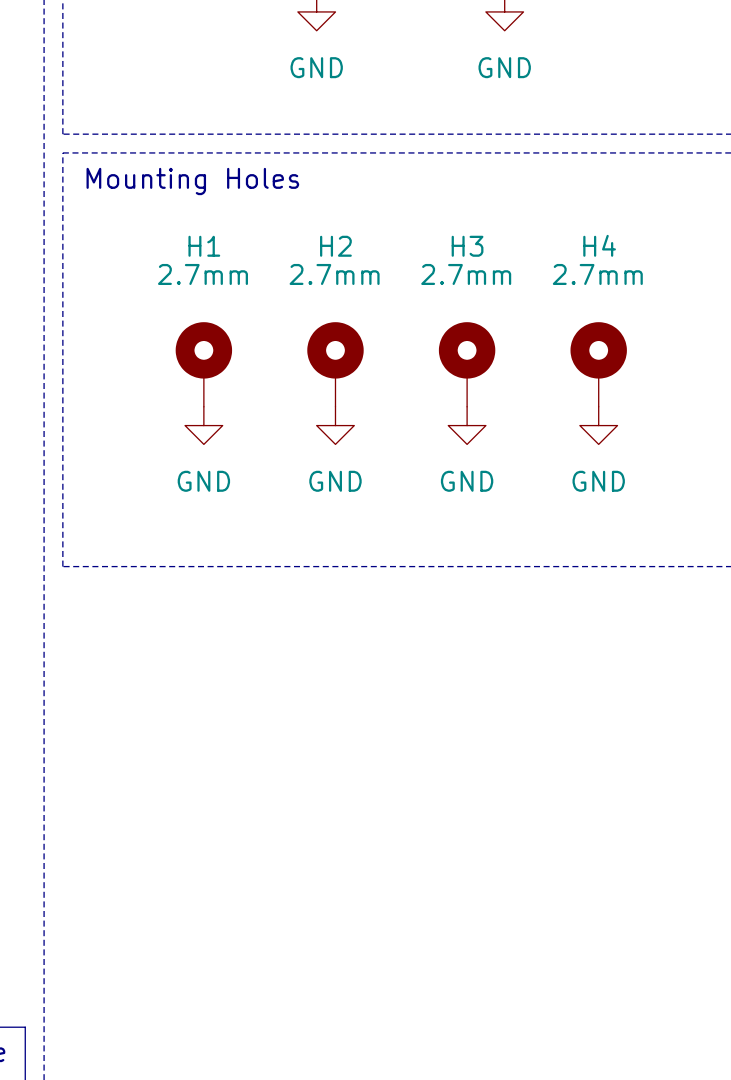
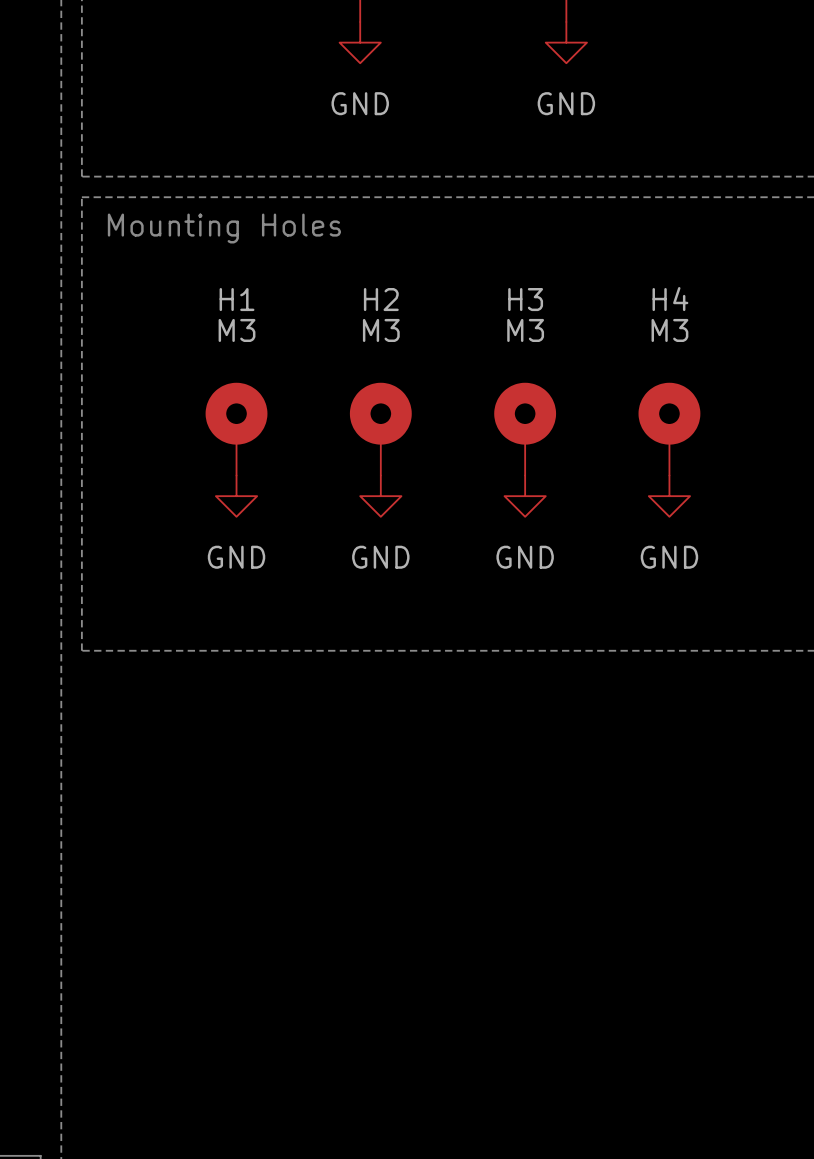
H1 value: 2.7mm (202, 274) -> M3 (237, 330)
H2 value: 2.7mm (334, 274) -> M3 (381, 330)
H3 value: 2.7mm (466, 274) -> M3 (525, 330)
H4 value: 2.7mm (597, 274) -> M3 (669, 330)

